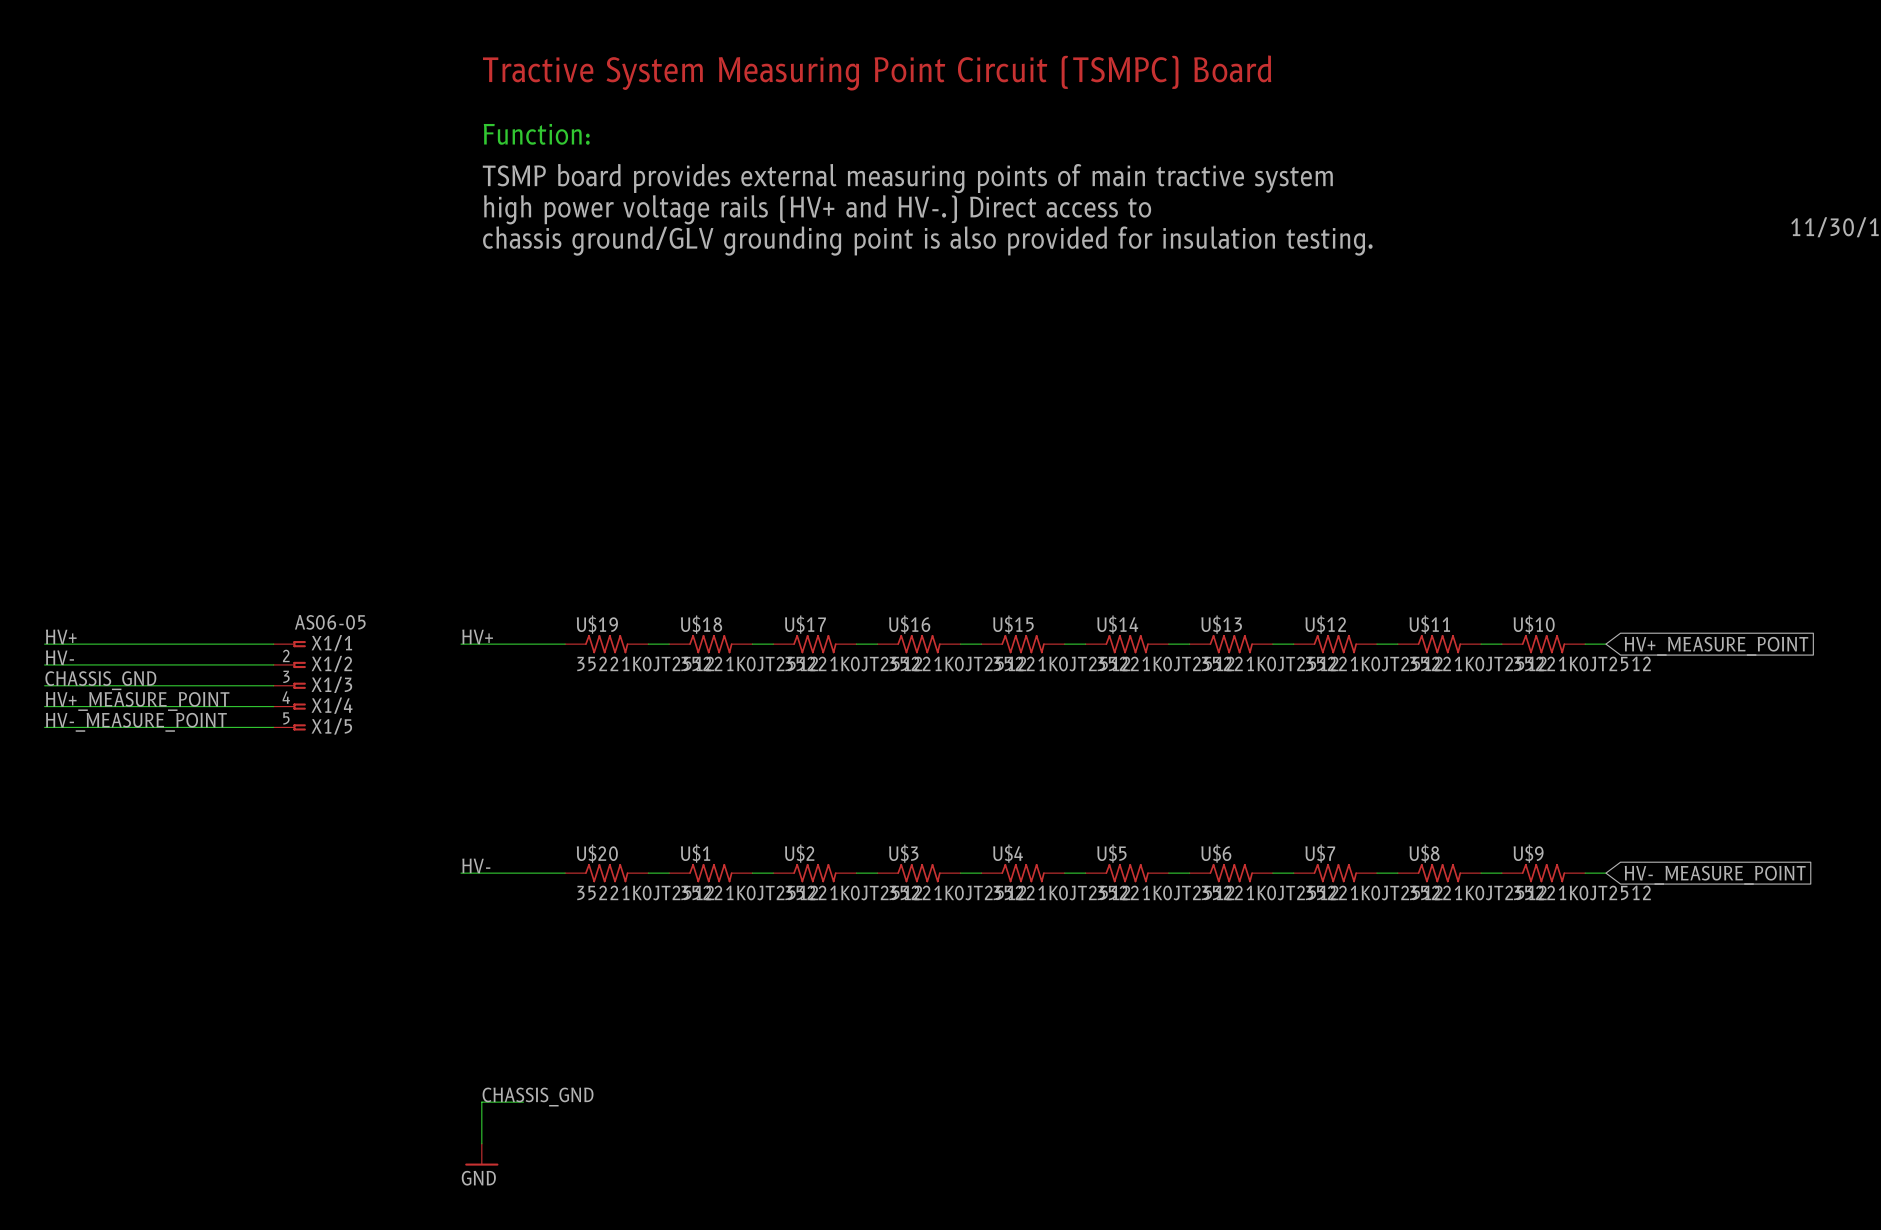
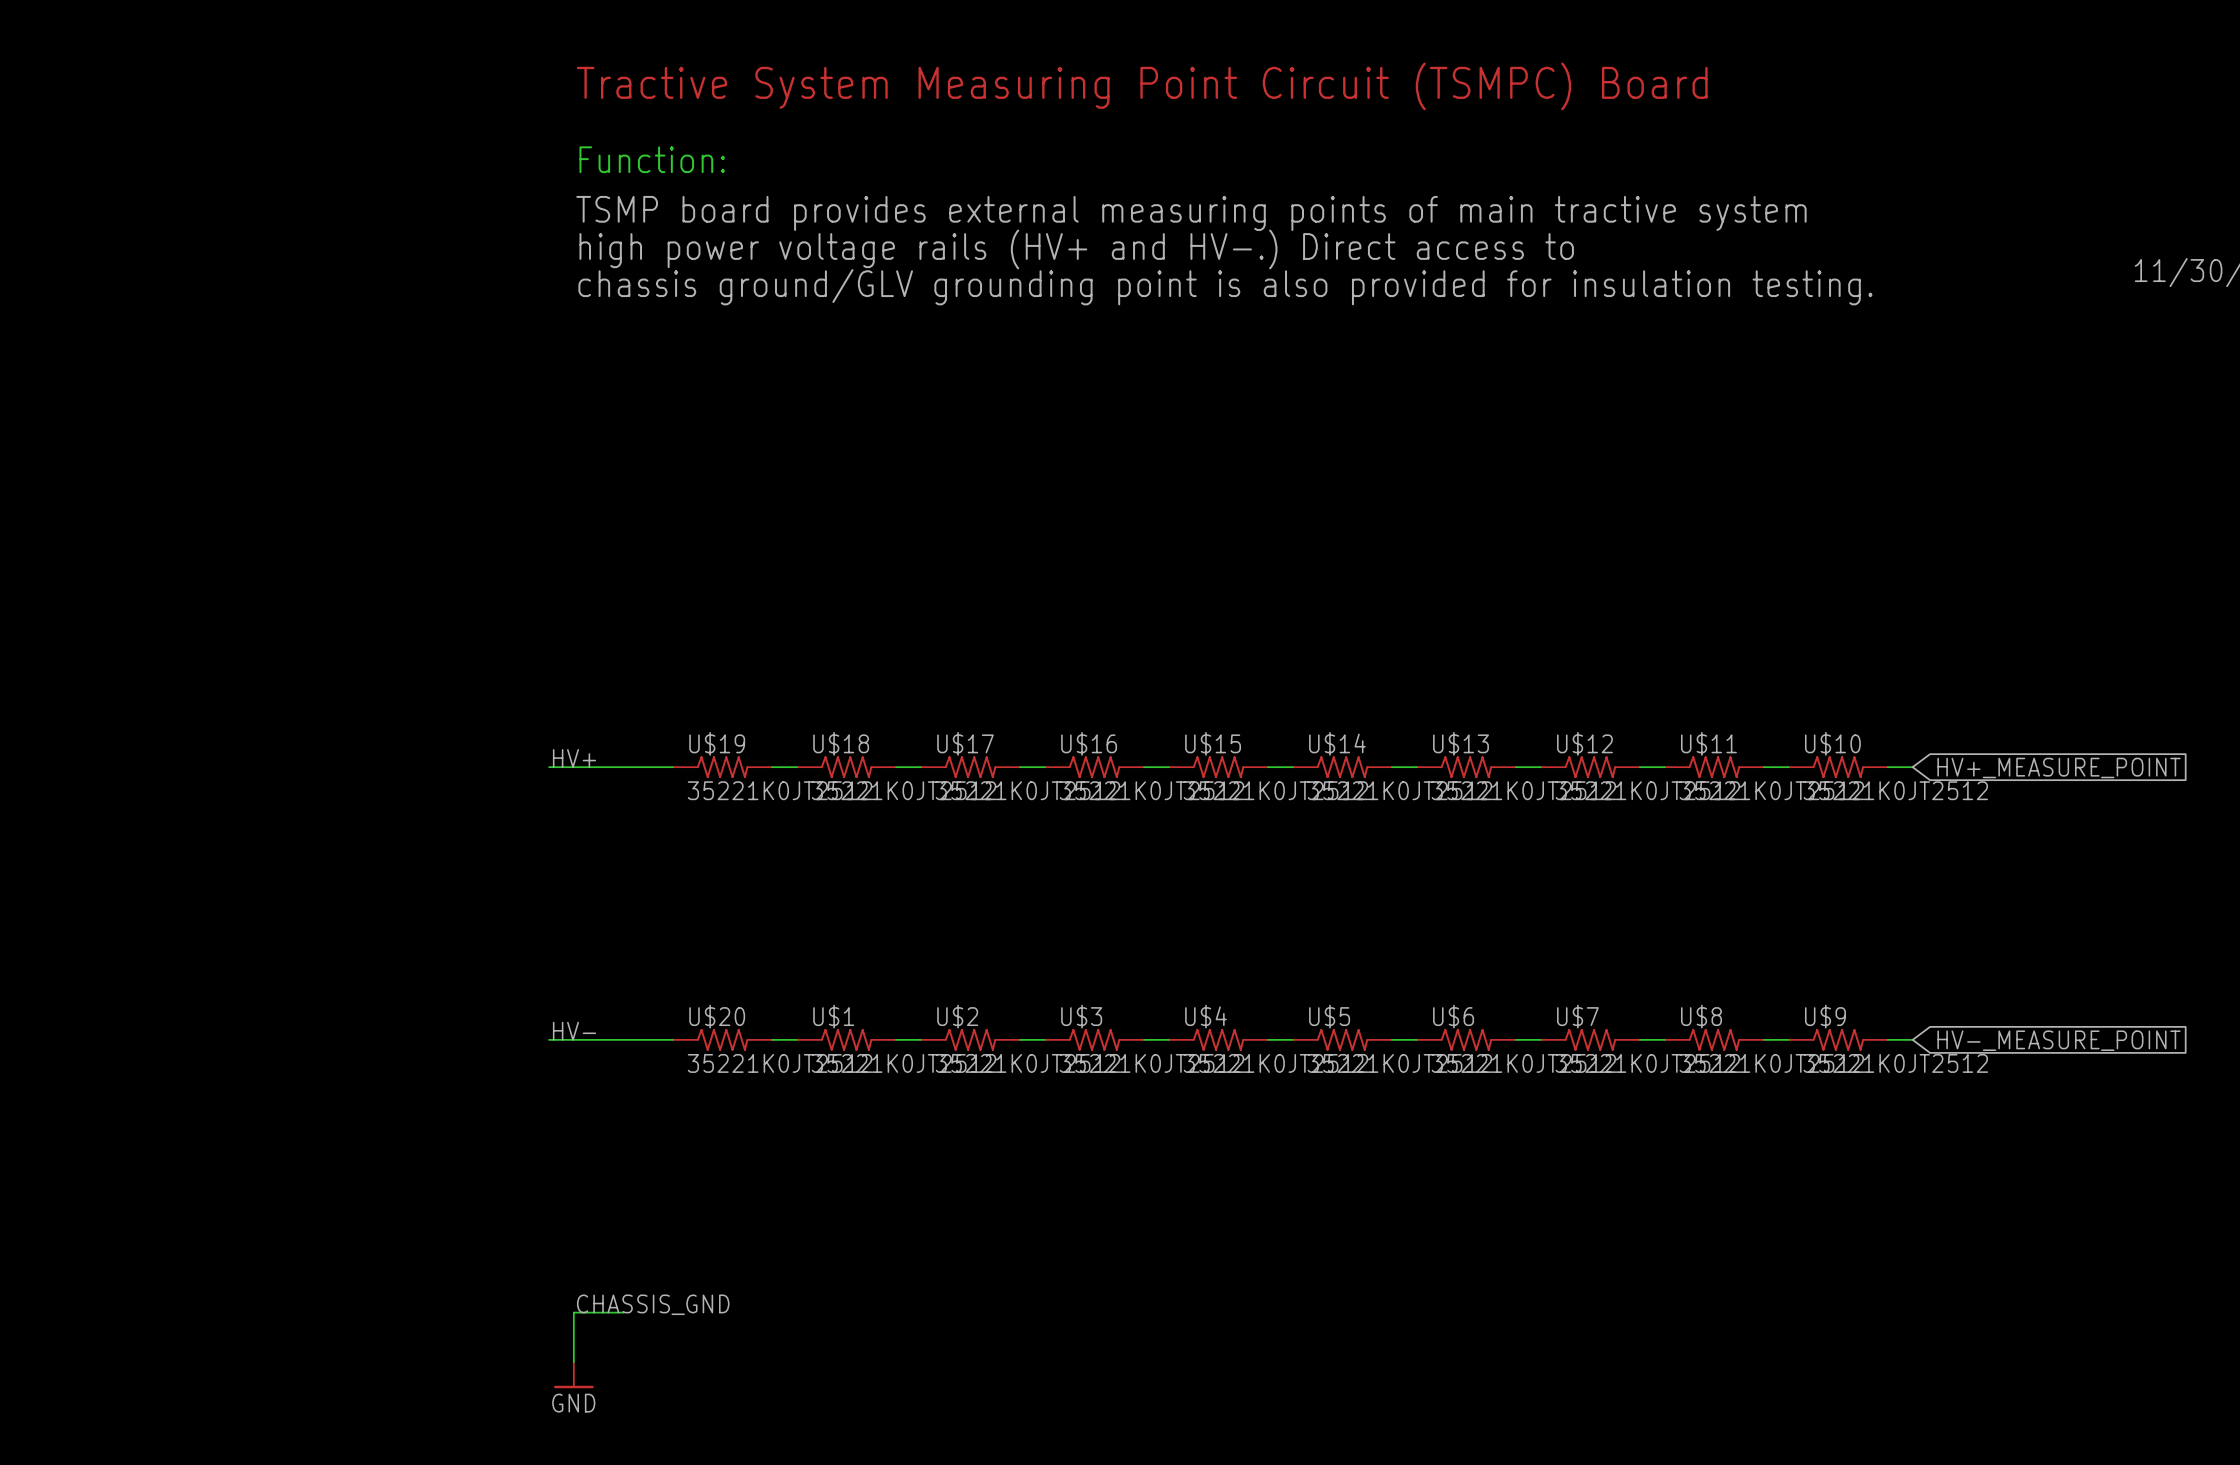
label: HV+ (61, 636) -> none
wire: (44, 644) (273, 644) -> none
X1/1: AS06-05 (289, 644) -> none
label: HV- (59, 657) -> none
wire: (44, 664) (273, 664) -> none
X1/2: (289, 664) -> none
label: CHASSIS_GND (100, 680) -> none
wire: (44, 685) (273, 685) -> none
X1/3: (289, 685) -> none
label: HV+_MEASURE_POINT (137, 701) -> none
wire: (44, 706) (273, 706) -> none
X1/4: (289, 706) -> none
label: HV-_MEASURE_POINT (136, 722) -> none
wire: (44, 727) (273, 727) -> none
X1/5: (289, 727) -> none

